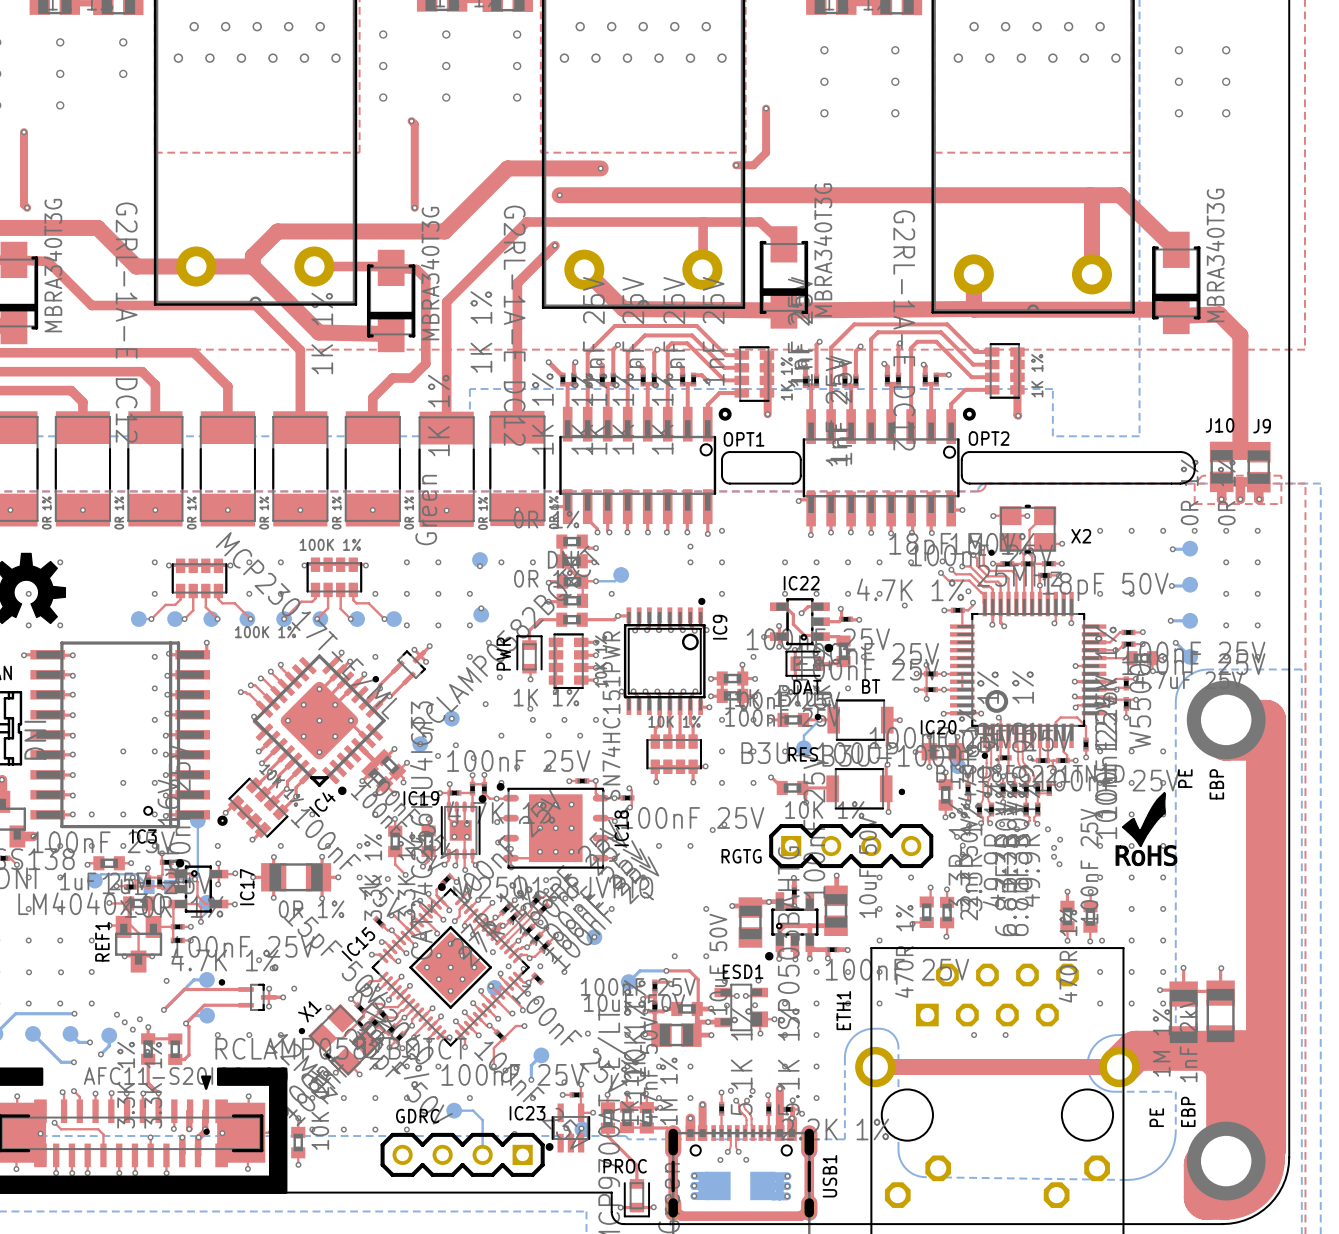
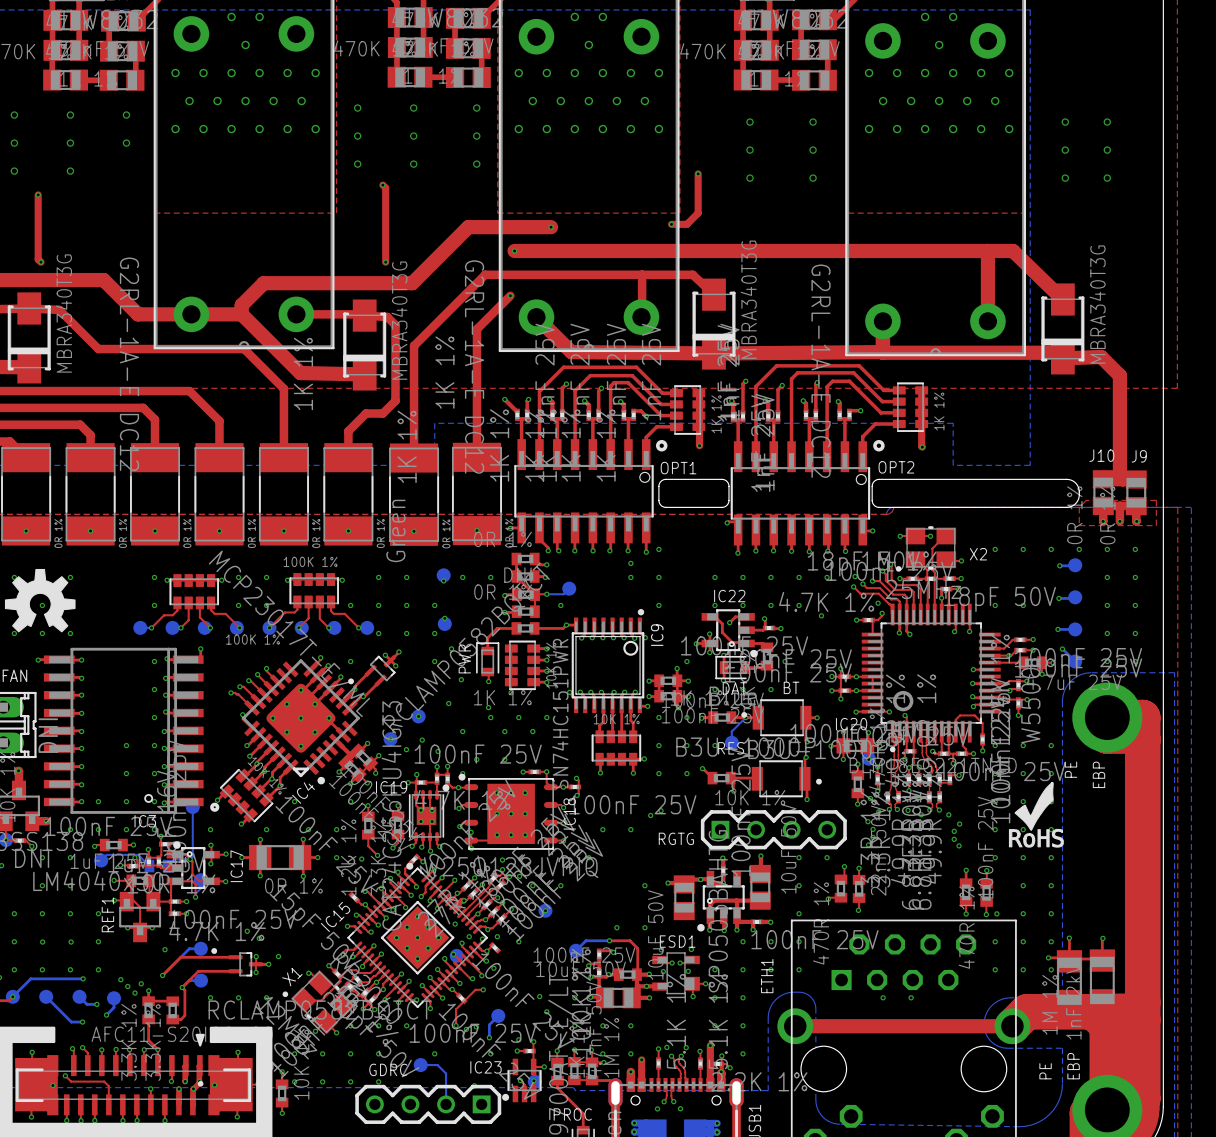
part value: 3.3K 1% (373, 877) -> 1.2K 1% (348, 857)

